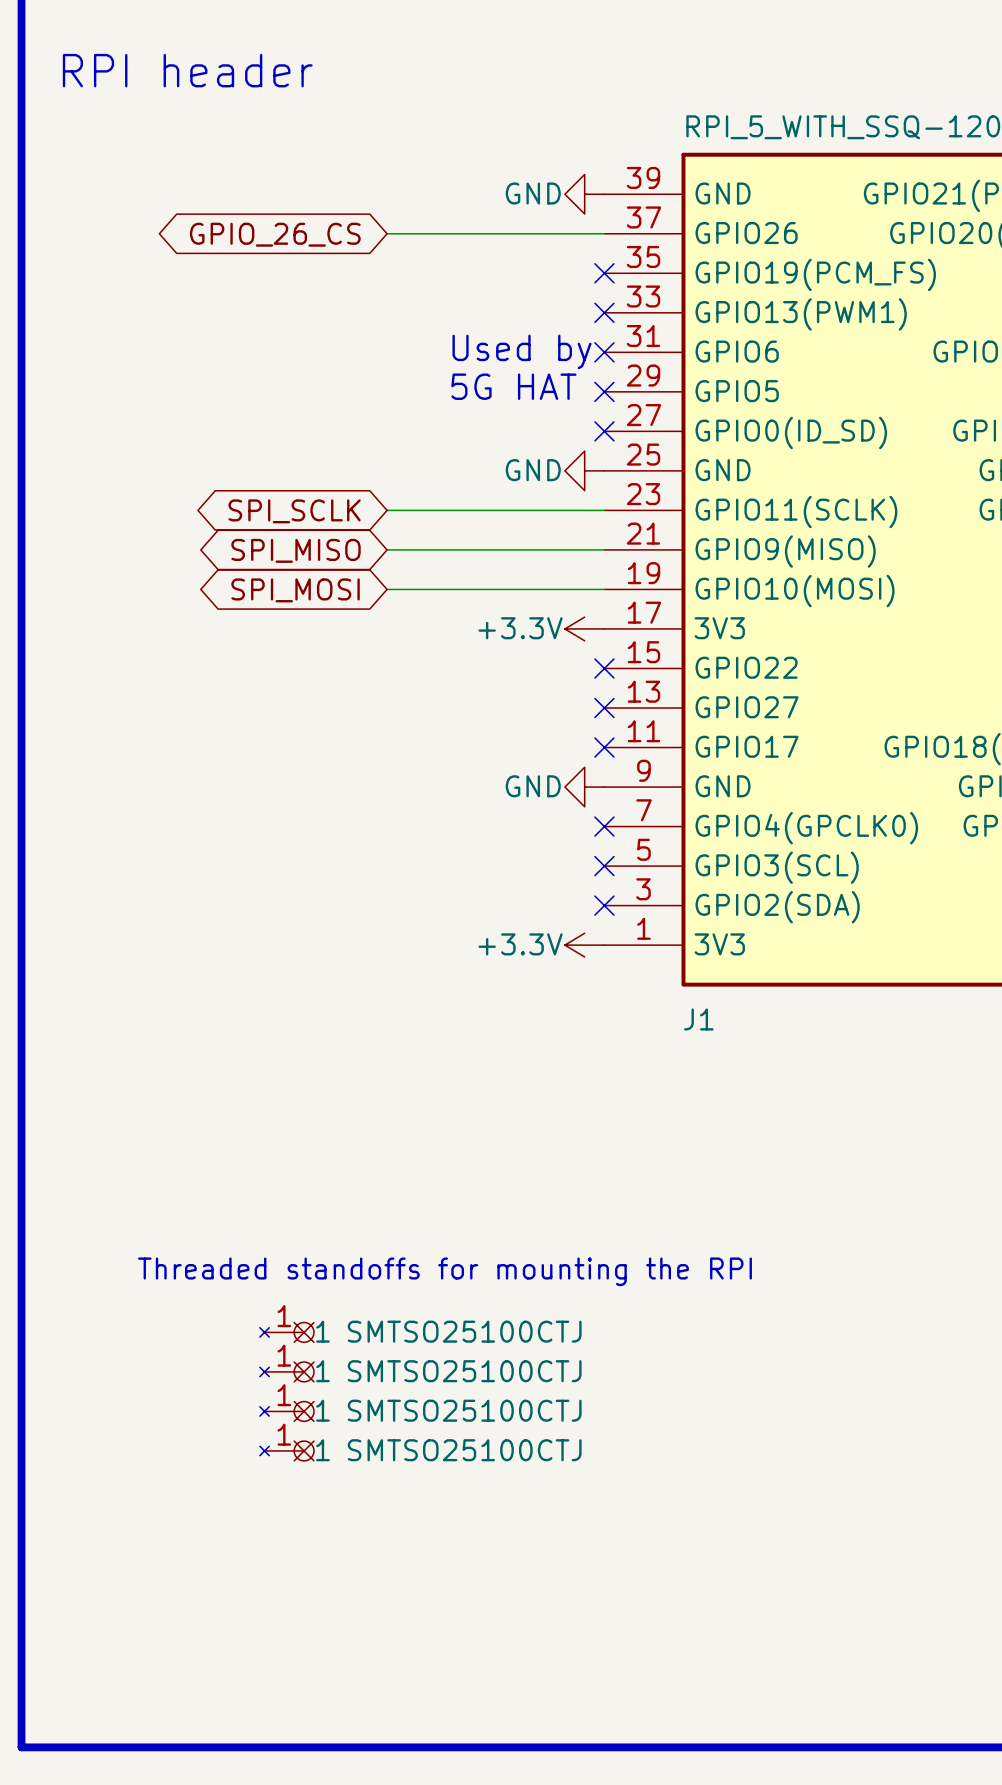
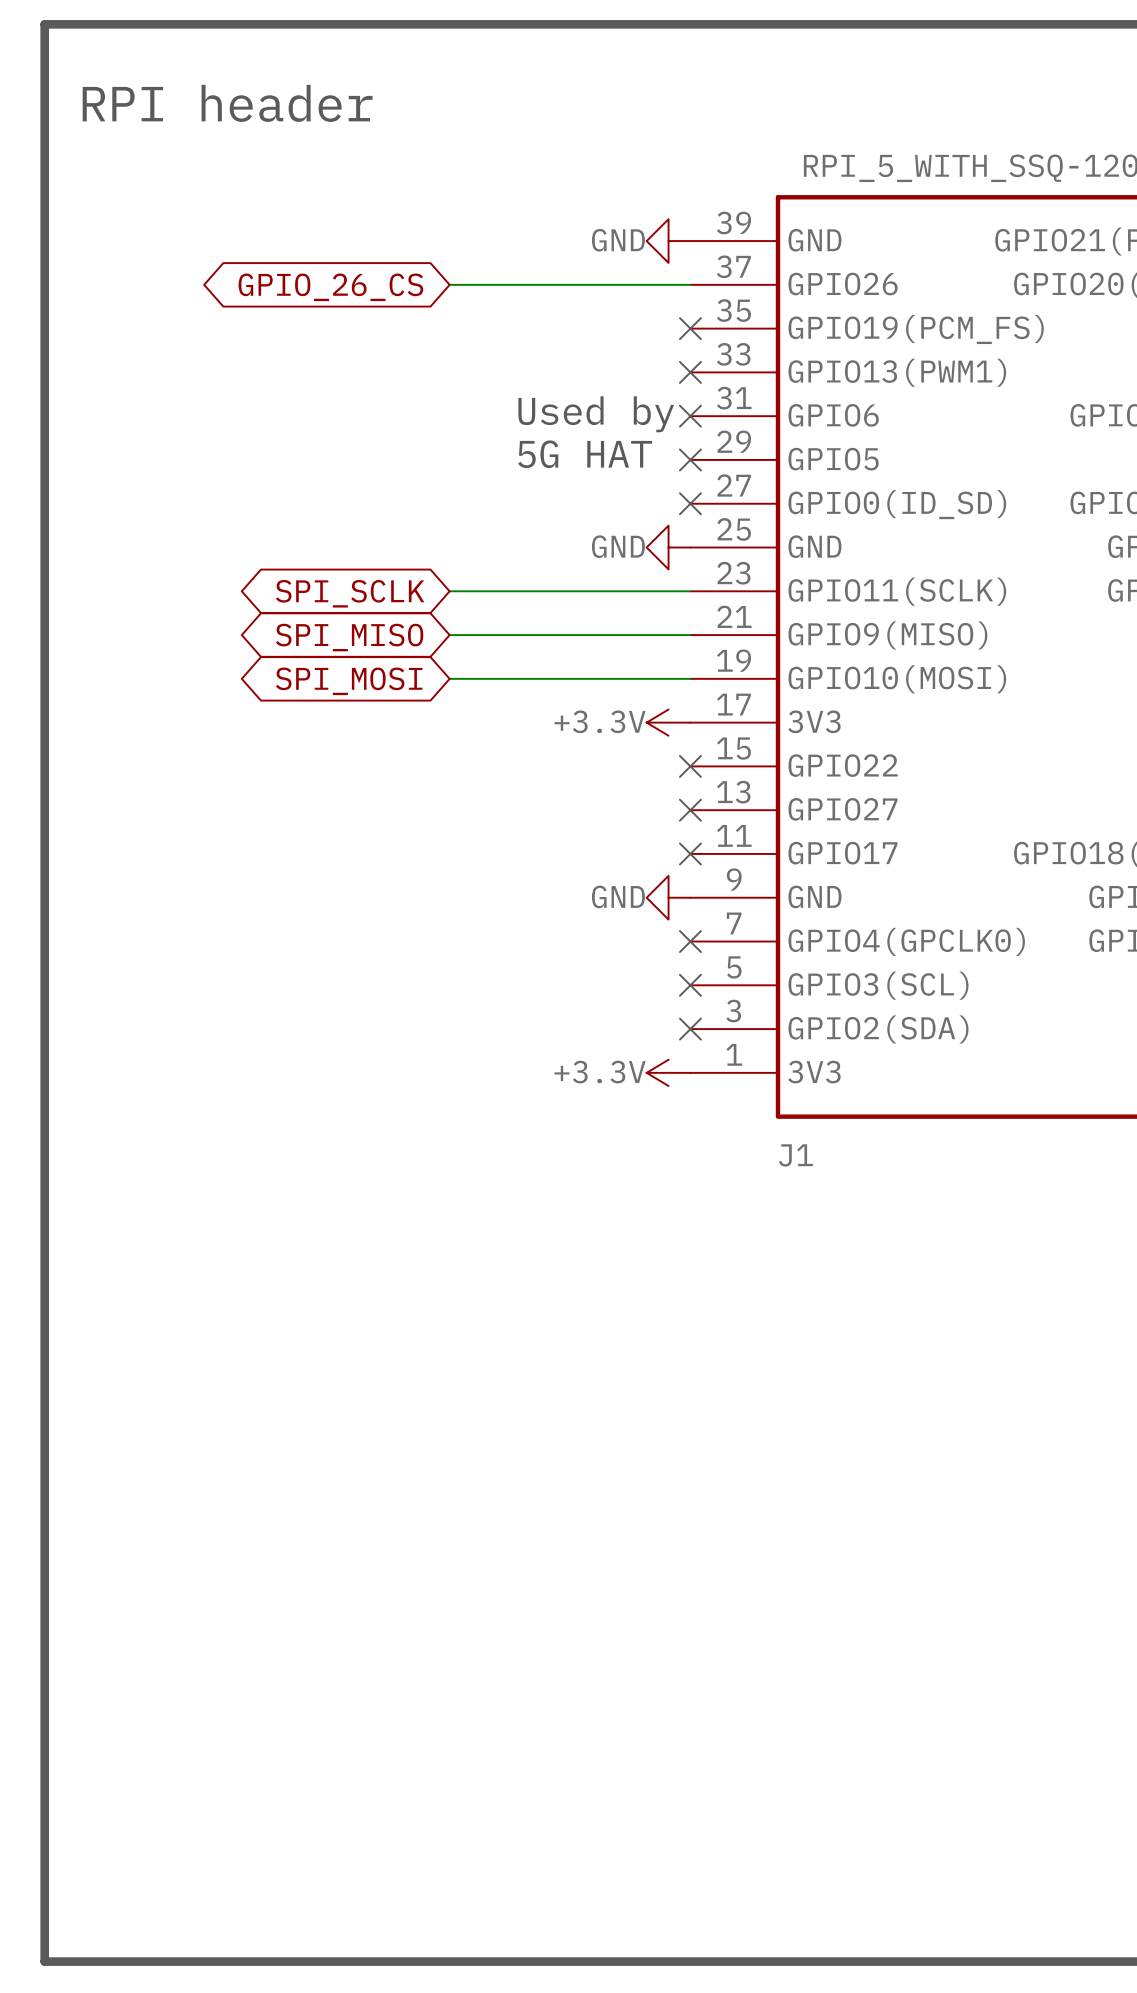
text: Threaded standoffs for mounting the RPI (444, 1271) -> none
part: SMTSO25100CTJ (286, 1332) -> none
part: SMTSO25100CTJ (286, 1371) -> none
part: SMTSO25100CTJ (286, 1411) -> none
part: SMTSO25100CTJ (286, 1450) -> none

